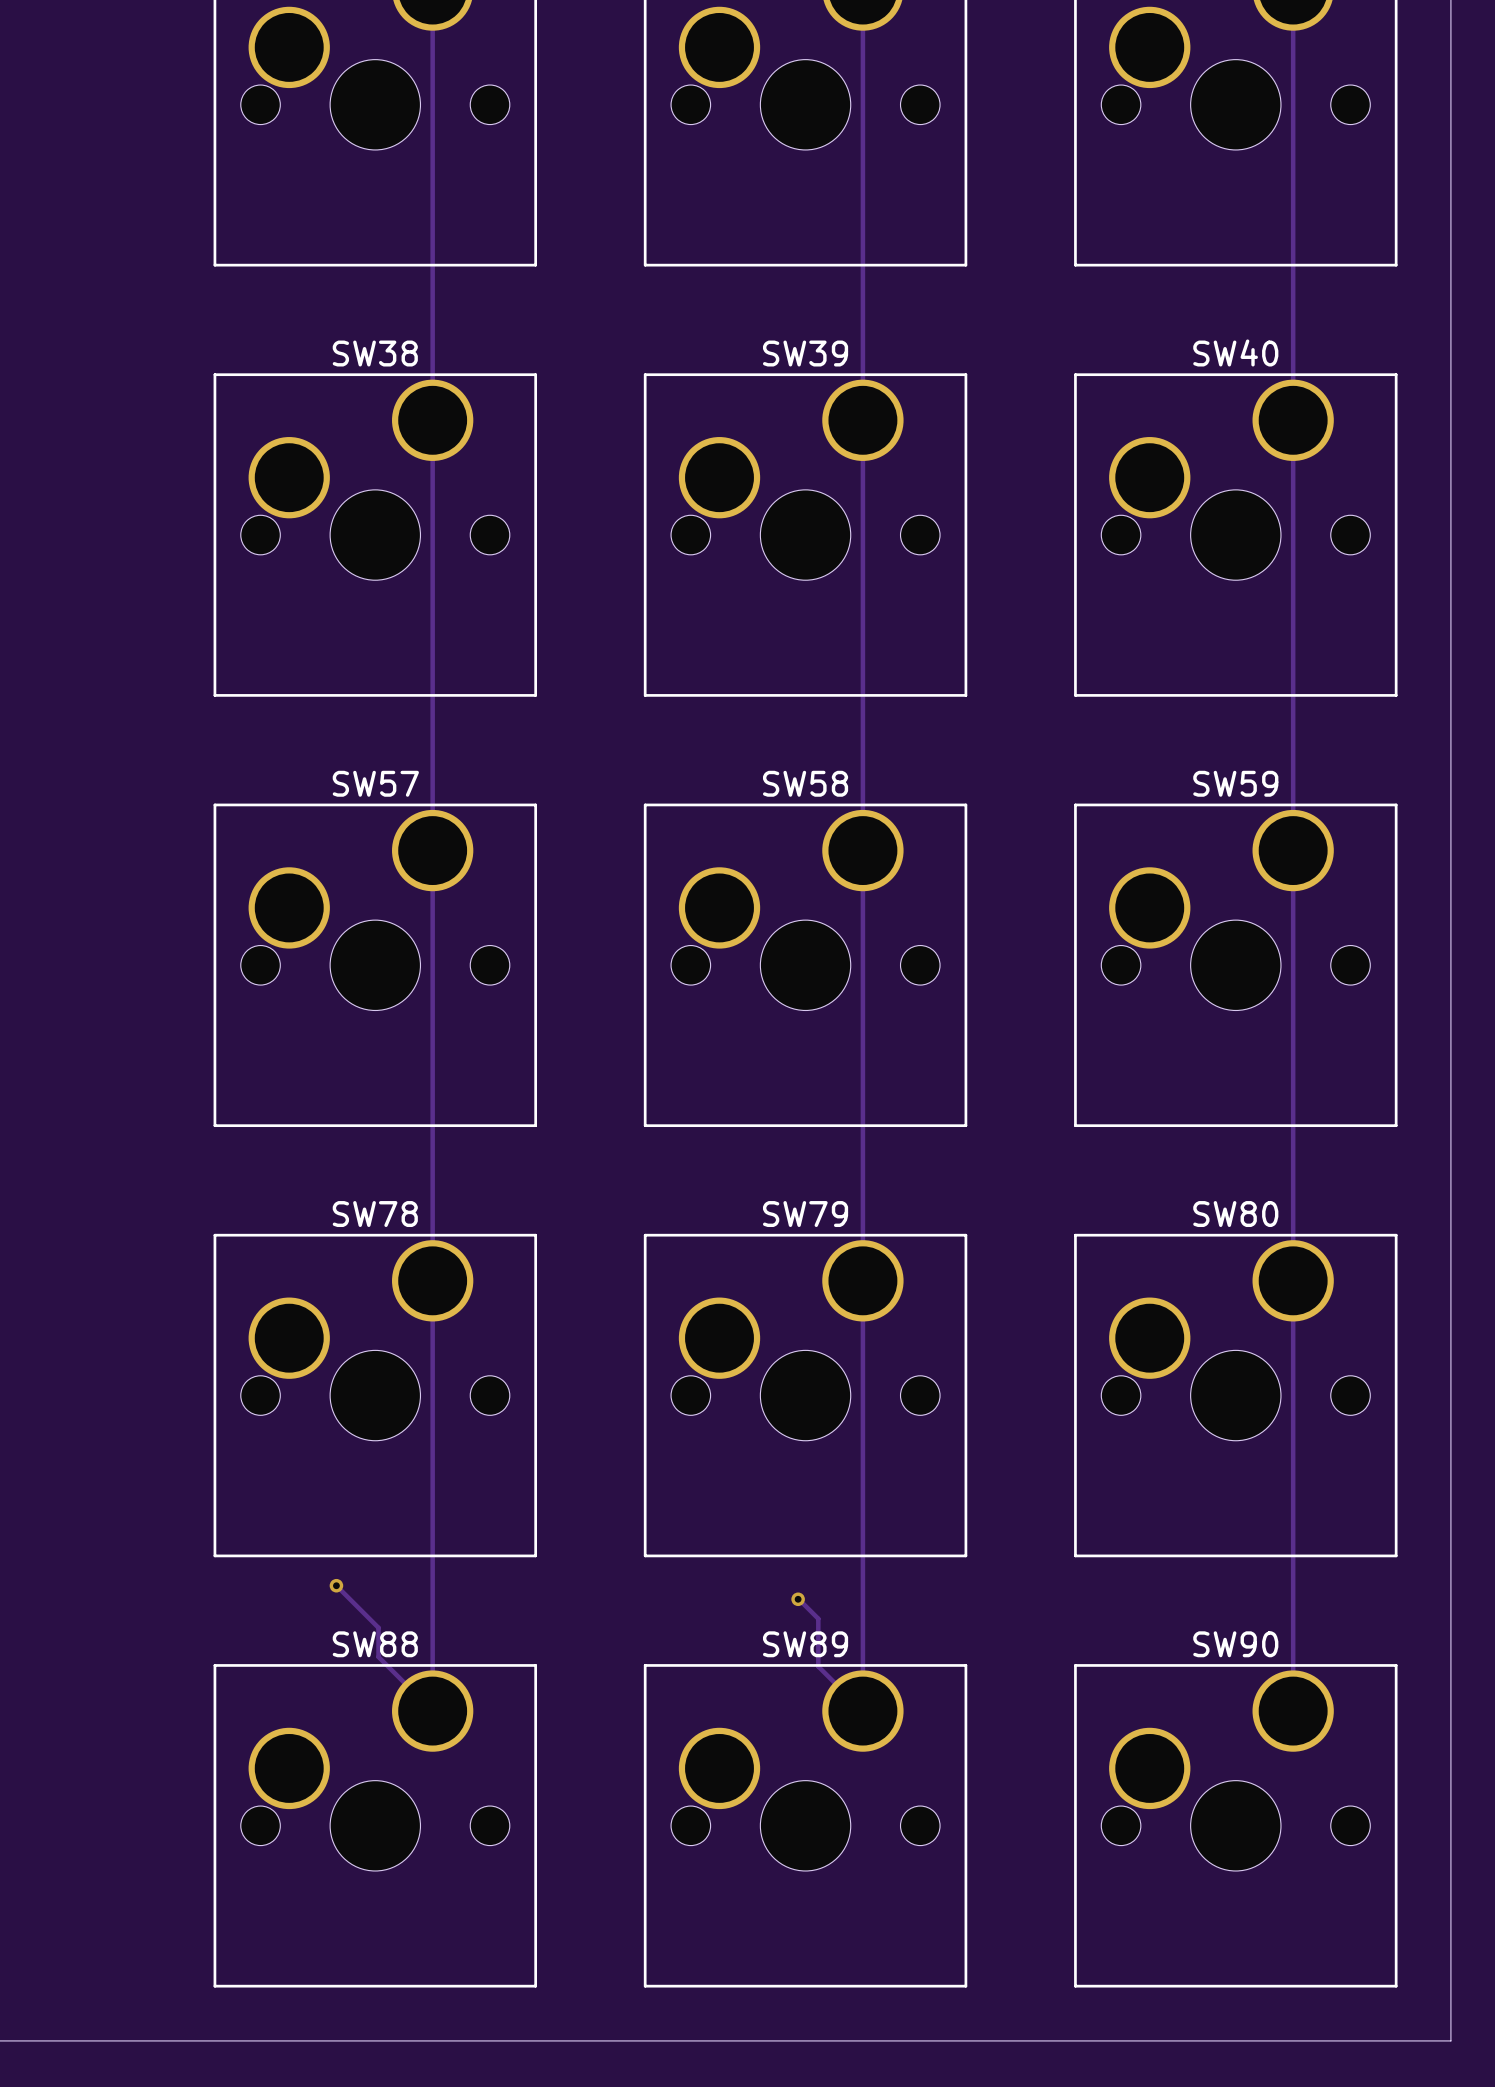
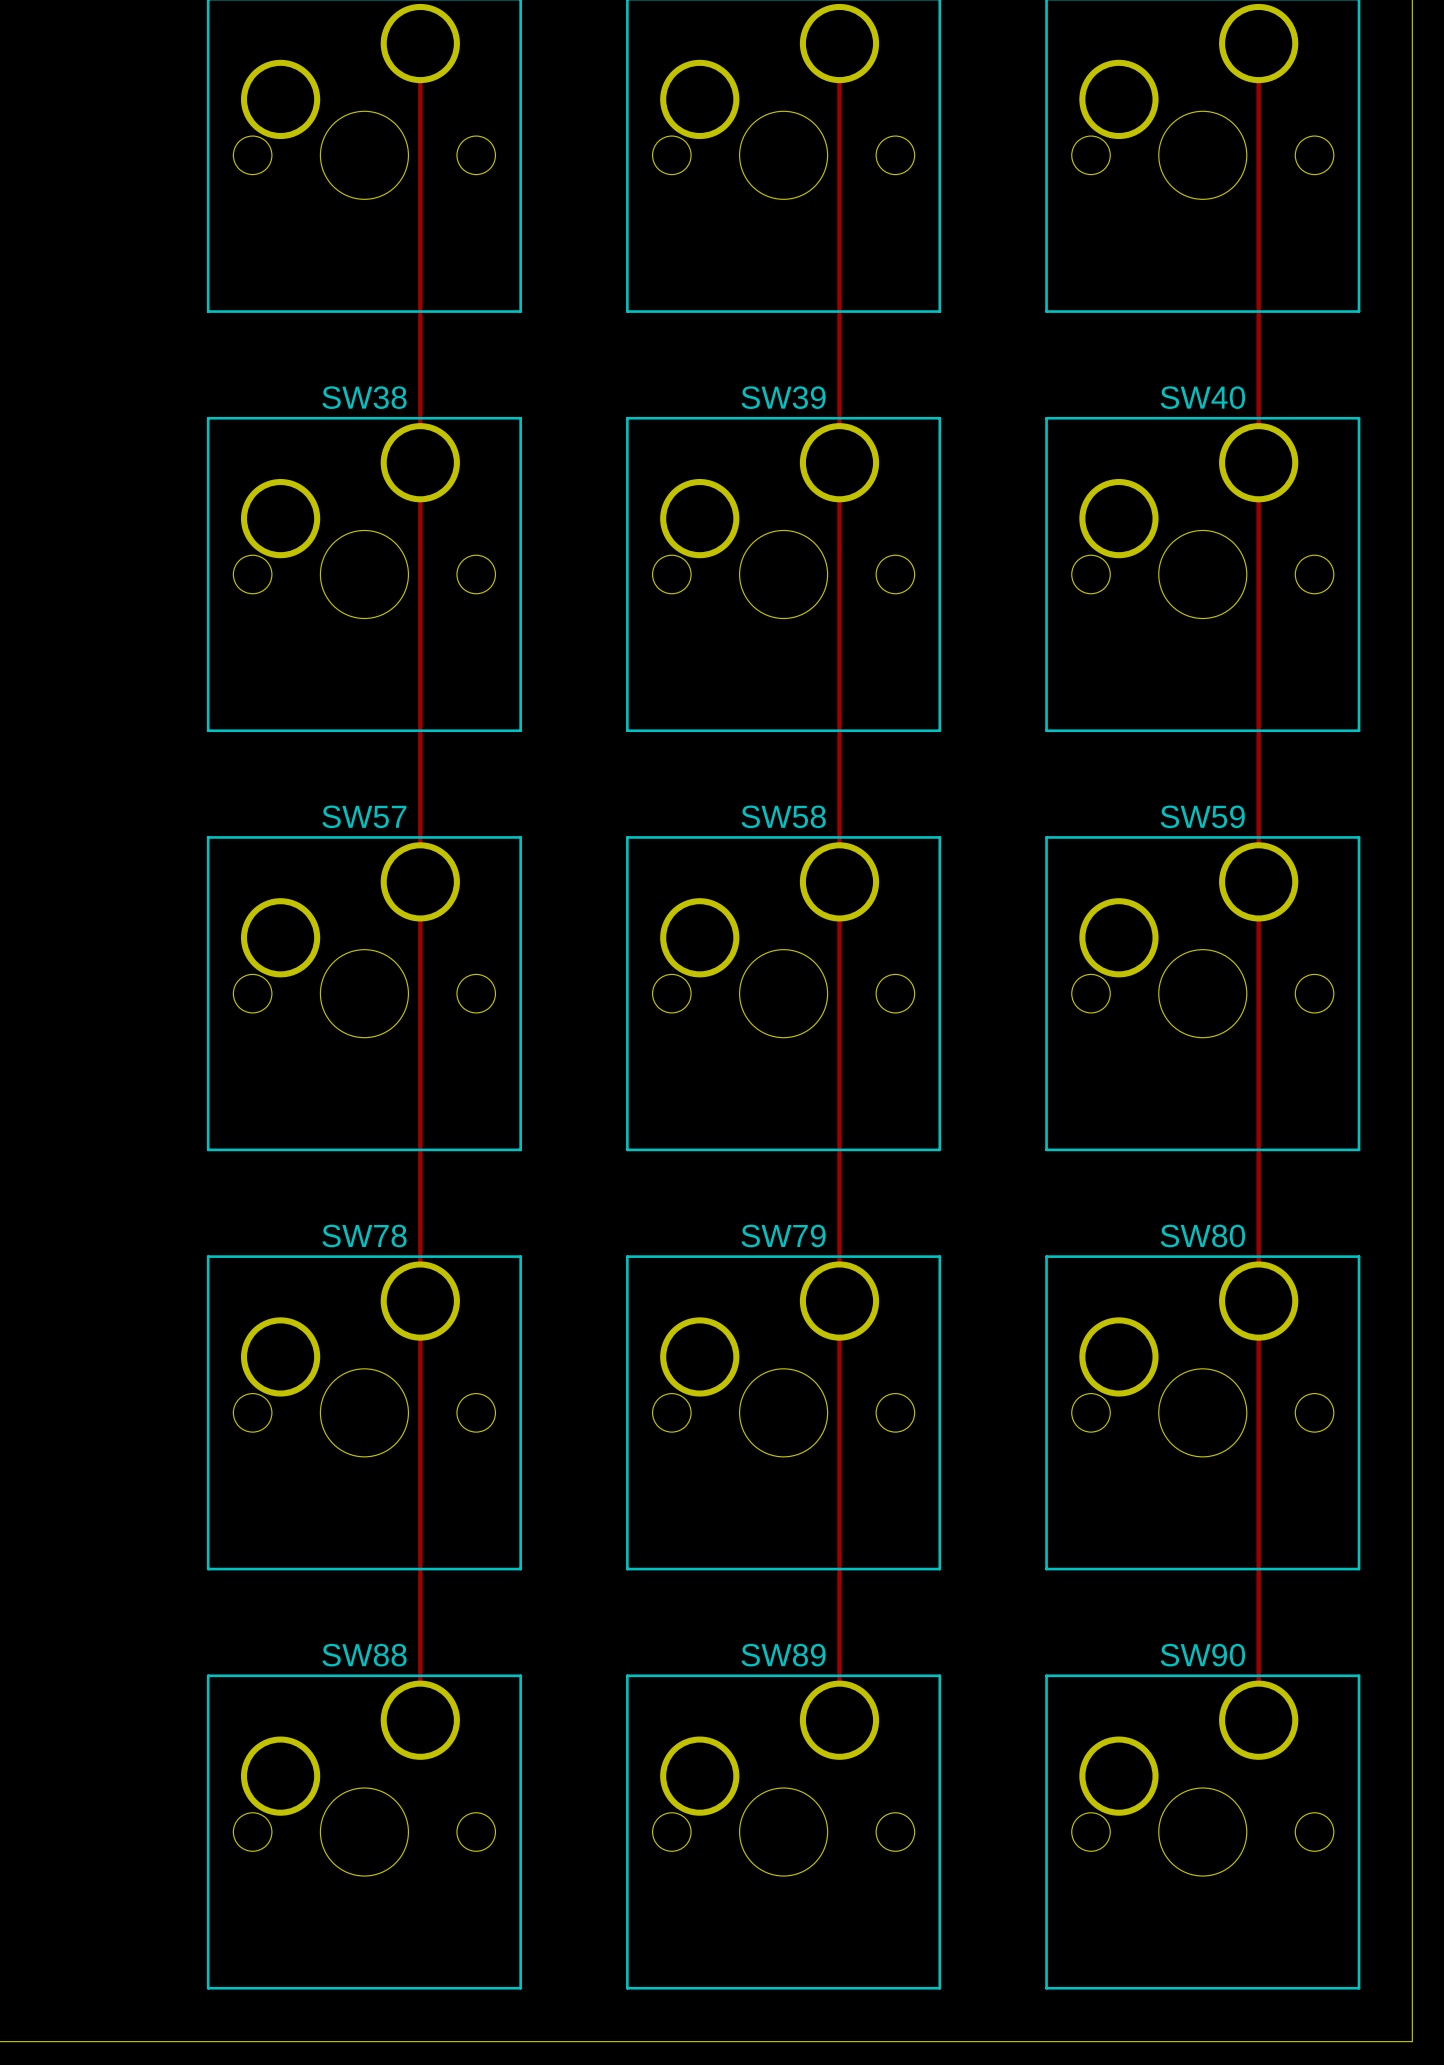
track: (336, 1585) (378, 1627) (378, 1656) (432, 1711) -> none
via: (336, 1585) -> none
track: (798, 1599) (818, 1618) (818, 1666) (862, 1711) -> none
via: (798, 1599) -> none

